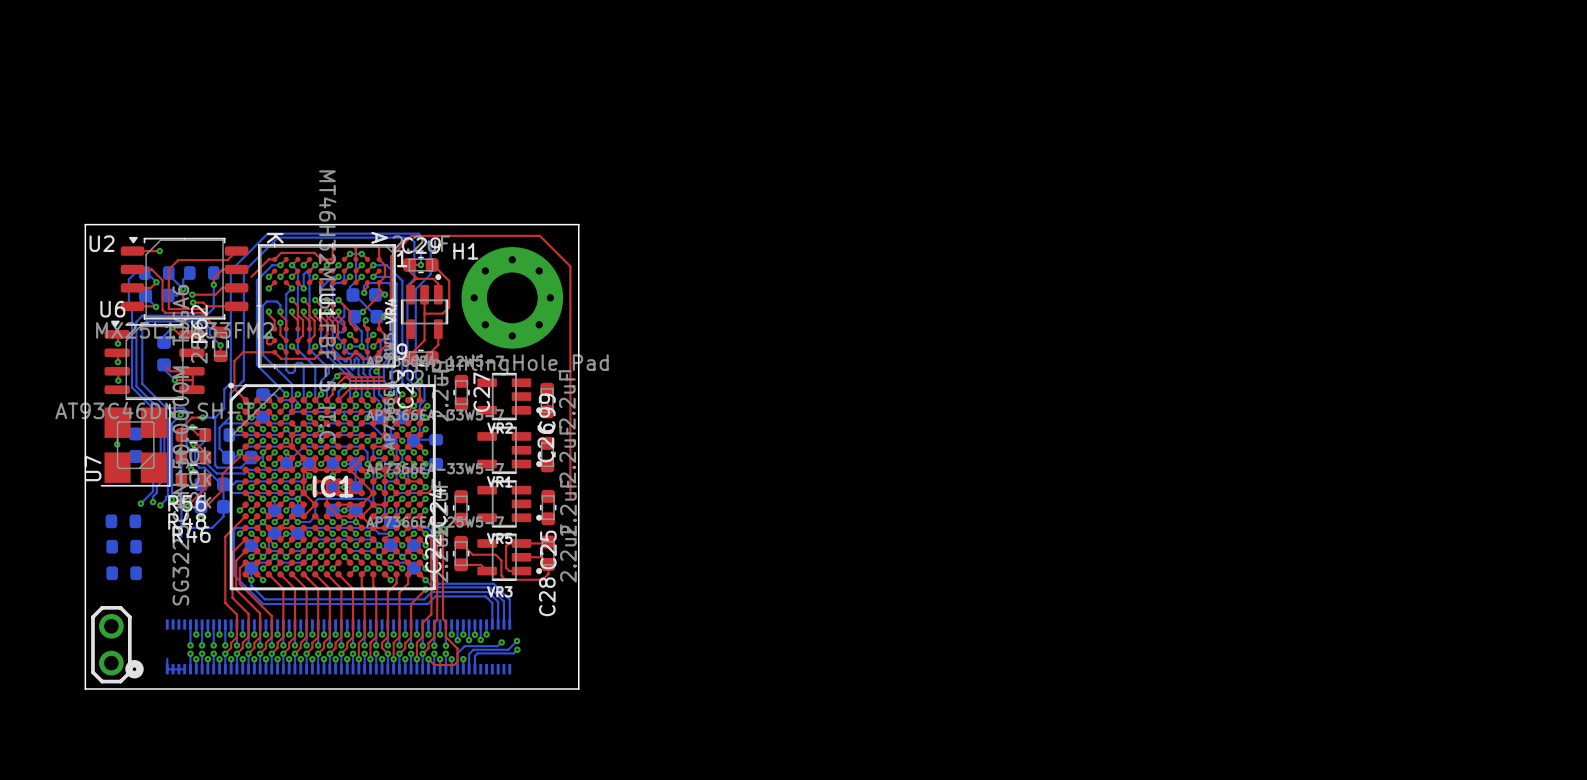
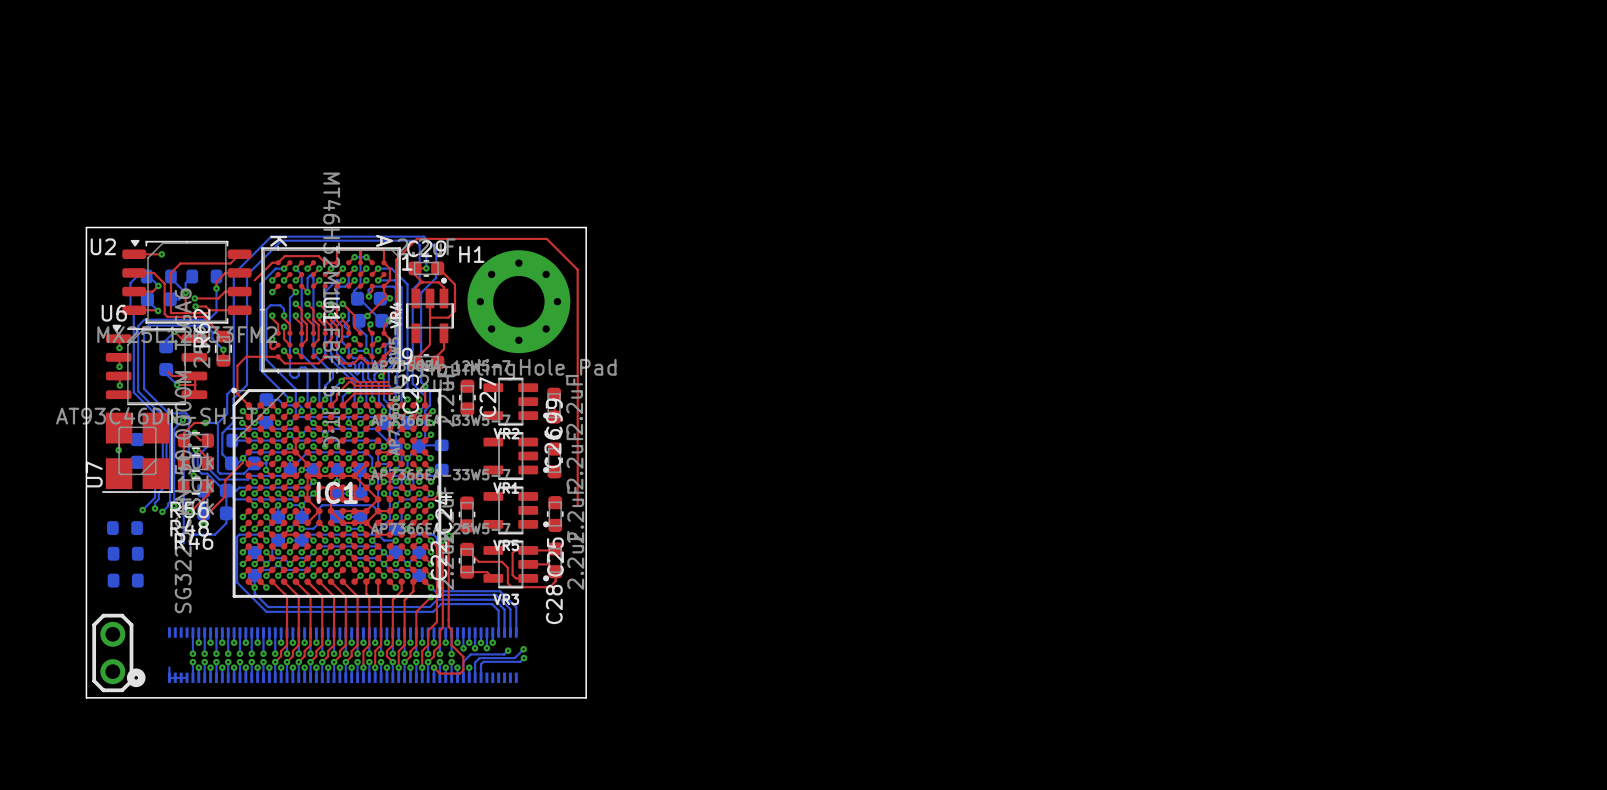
top track: (239, 522) (225, 536) (225, 602) (236, 614) (236, 637) (225, 653) -> none
via: none -> (242, 528)
top track: (239, 545) (232, 552) (232, 597) (248, 613) (248, 636) (236, 653) -> none
via: none -> (242, 552)
top track: (239, 556) (236, 560) (236, 589) (260, 613) (260, 637) (248, 653) -> none
via: none -> (242, 564)
top track: (239, 568) (239, 584) (271, 616) (271, 637) (260, 653) -> none
via: none -> (242, 575)

